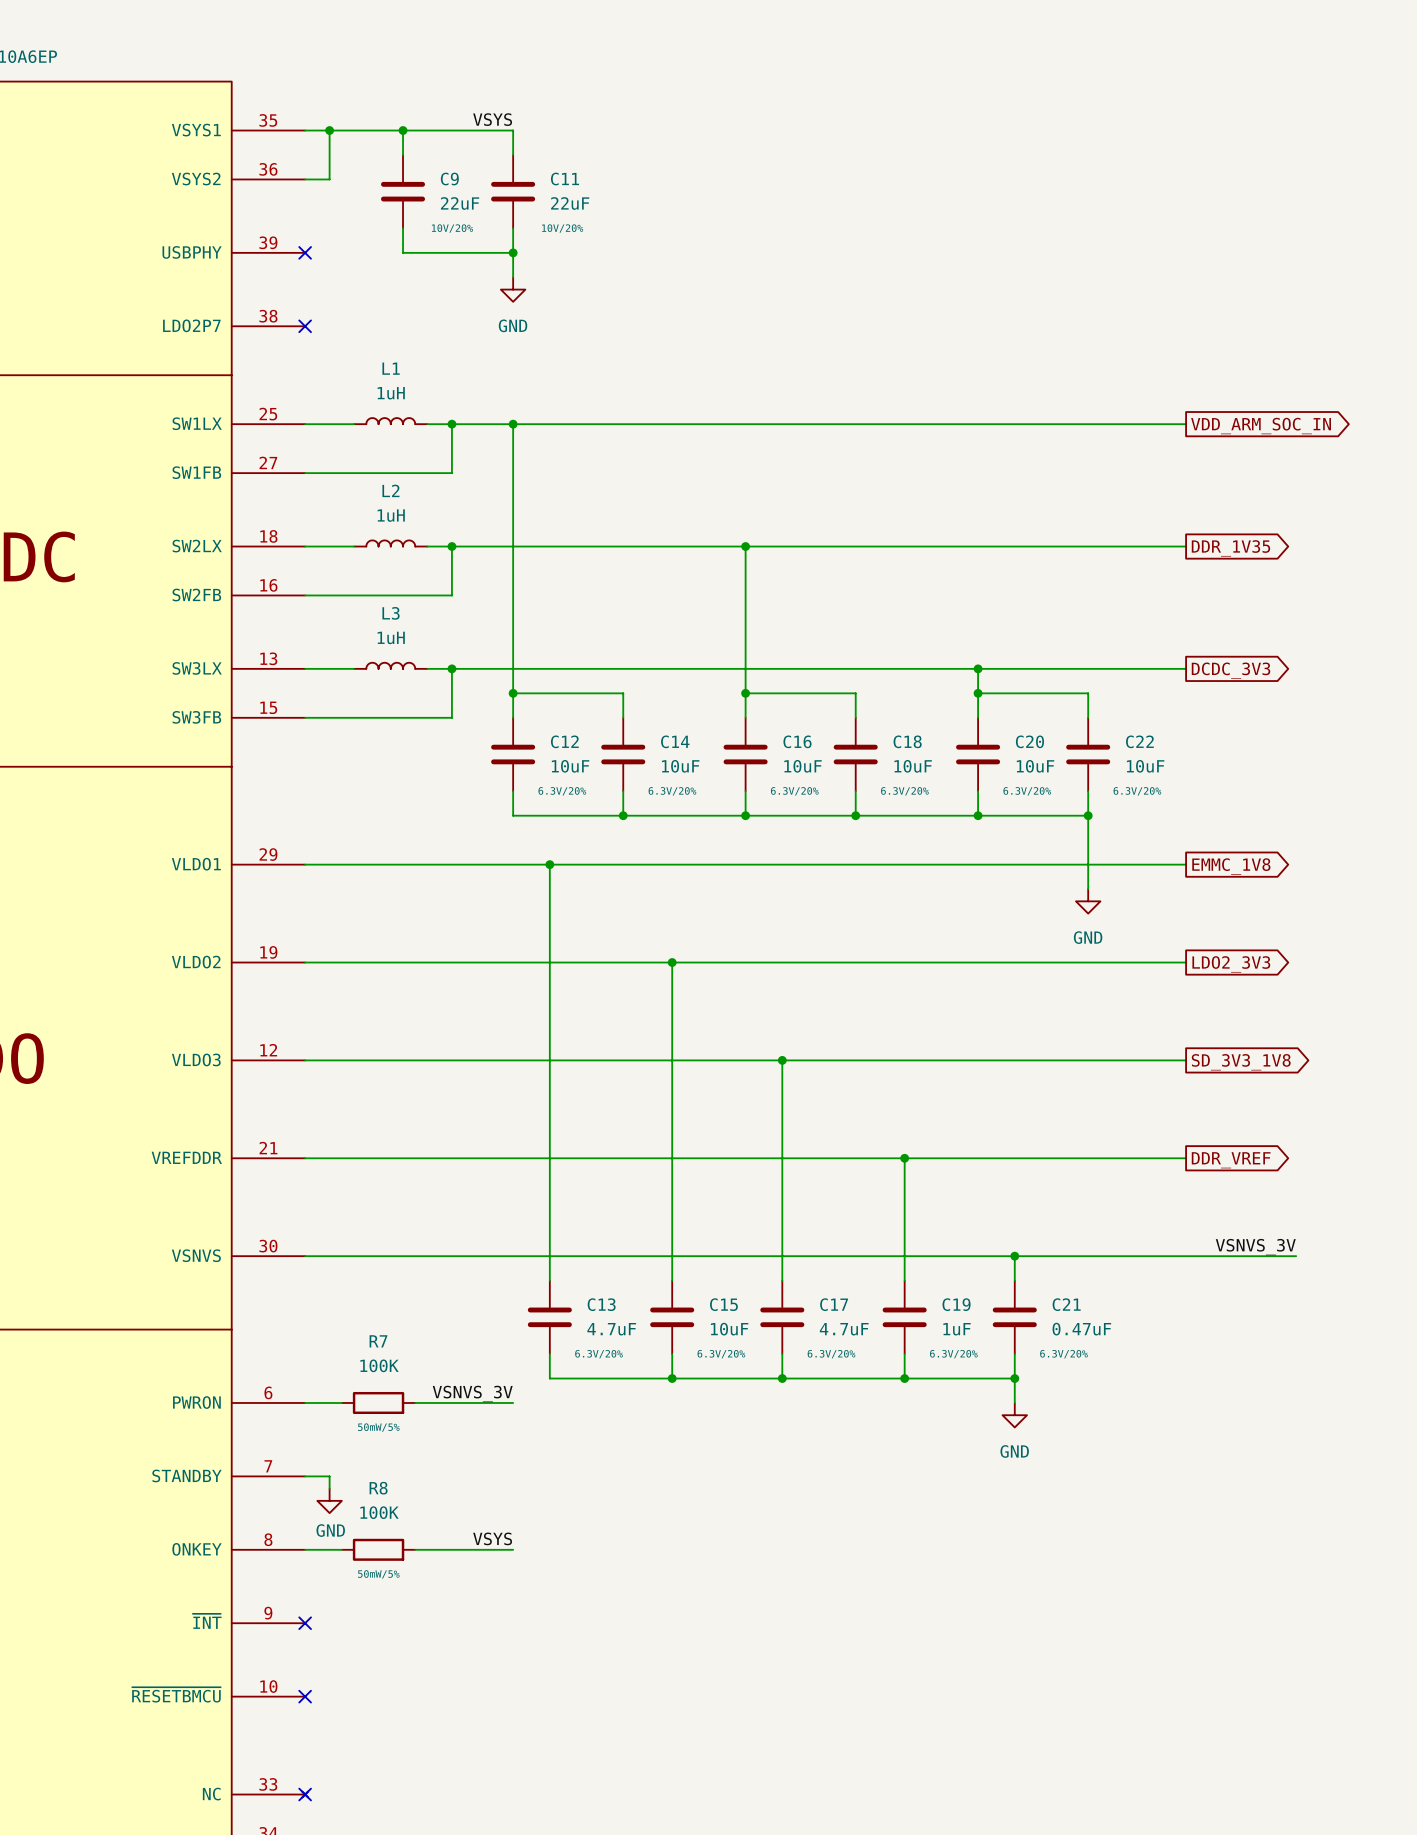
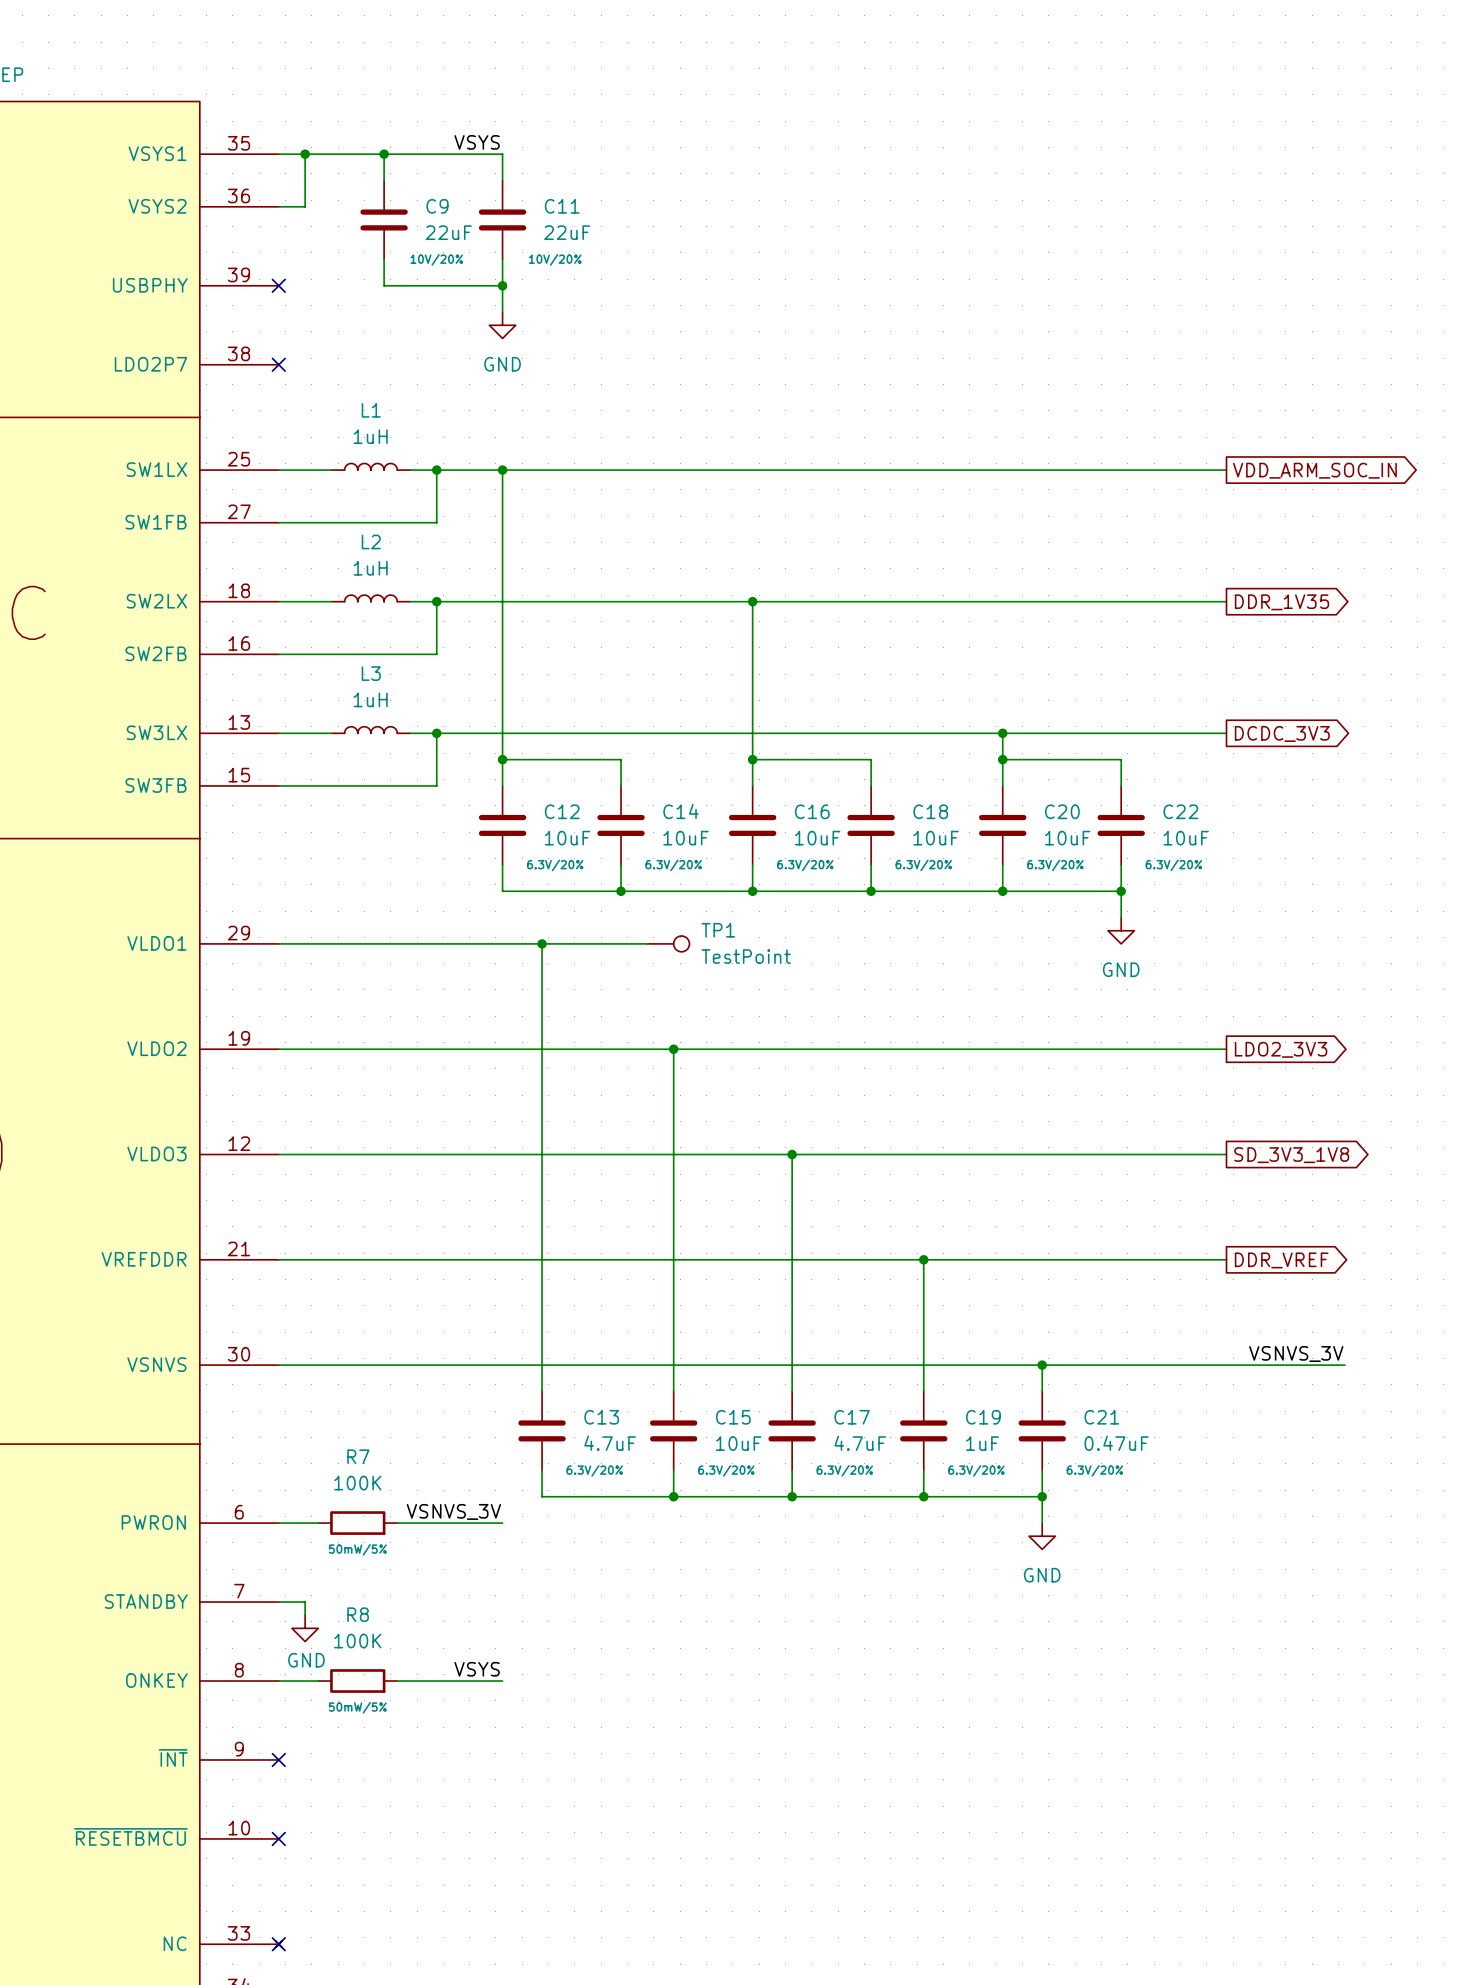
wire: (1088, 840) (1088, 889) -> none
wire: (647, 864) (1186, 864) -> none
TP1: none -> TestPoint (668, 943)
global label: EMMC_1V8 (1231, 866) -> none
power symbol position: GND (1088, 901) -> GND (1121, 930)

